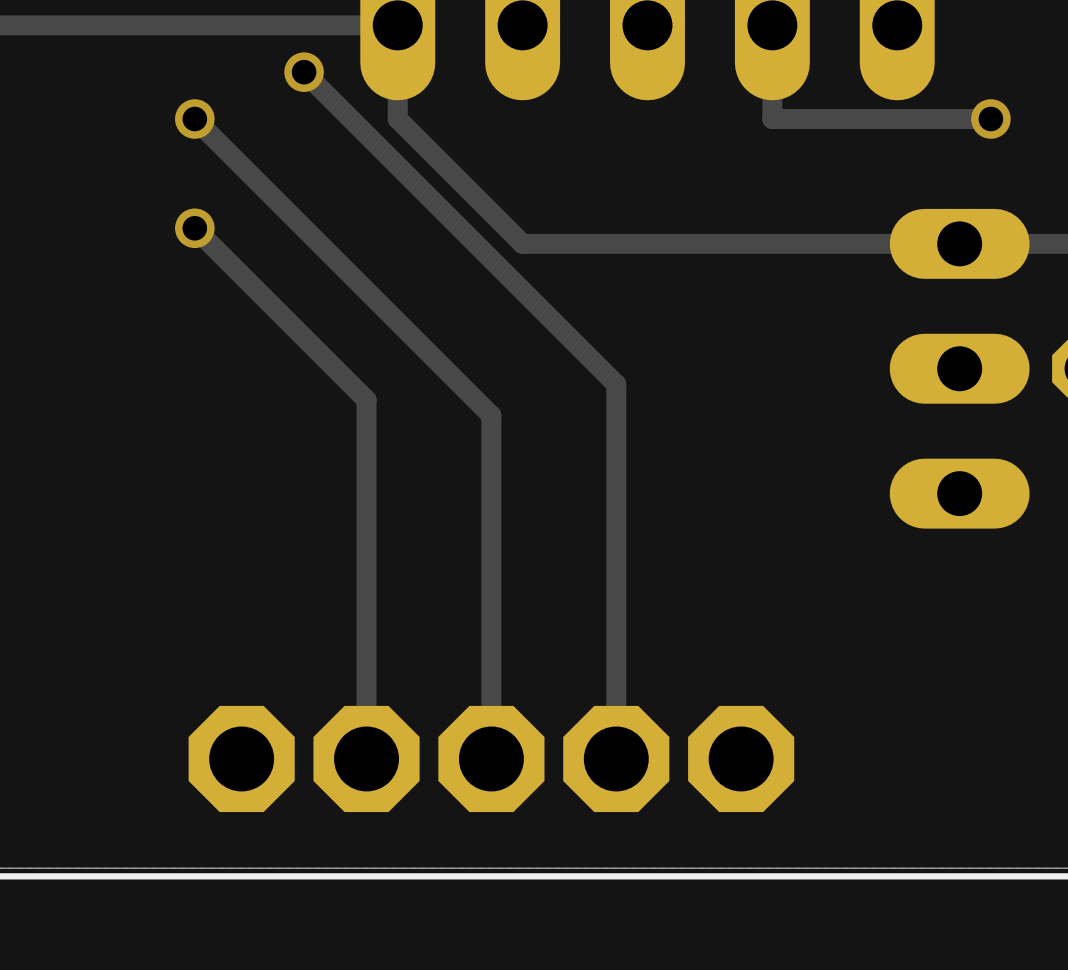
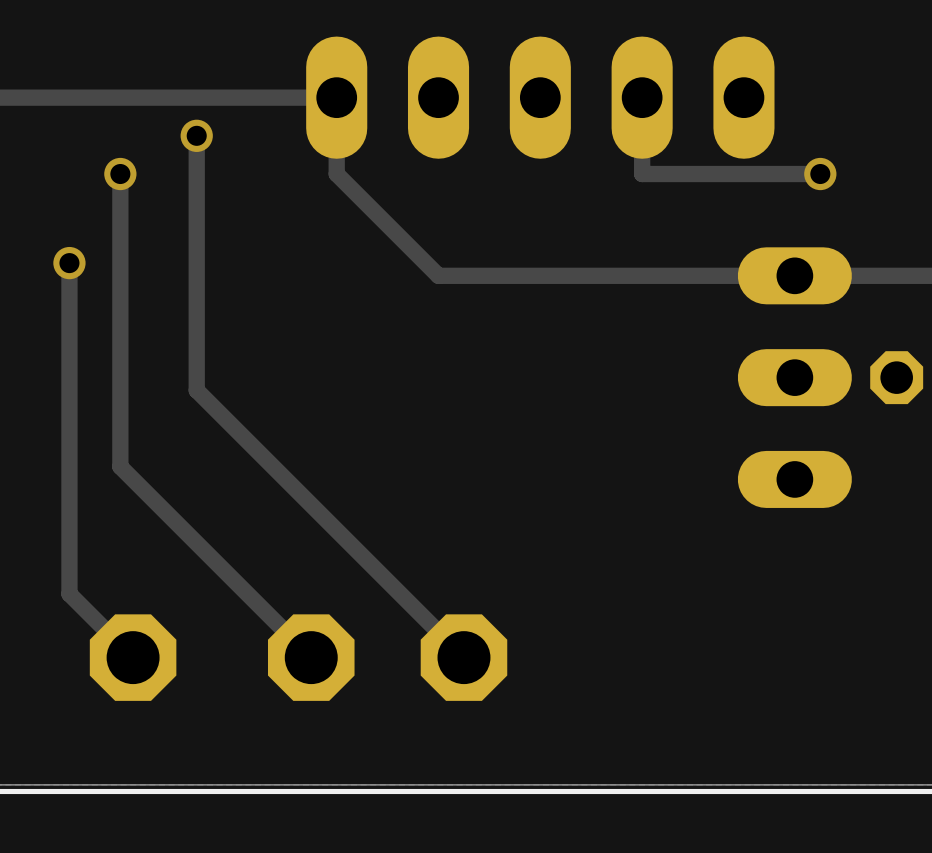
track: none -> (196, 135) (196, 390) (463, 657)
via: none -> (196, 135)
track: (304, 72) (616, 384) (616, 758) -> none
via: (304, 72) -> none
track: none -> (120, 174) (120, 466) (311, 657)
via: none -> (120, 174)
track: (194, 119) (491, 415) (491, 758) -> none
via: (194, 119) -> none
track: none -> (69, 263) (69, 593) (133, 657)
via: none -> (69, 263)
track: (194, 228) (366, 399) (366, 758) -> none
via: (194, 228) -> none
part: none -> (463, 657)
part position: (241, 758) -> (133, 657)
part position: (366, 758) -> (311, 657)
part: (491, 758) -> none
part: (616, 758) -> none
part: (741, 758) -> none

